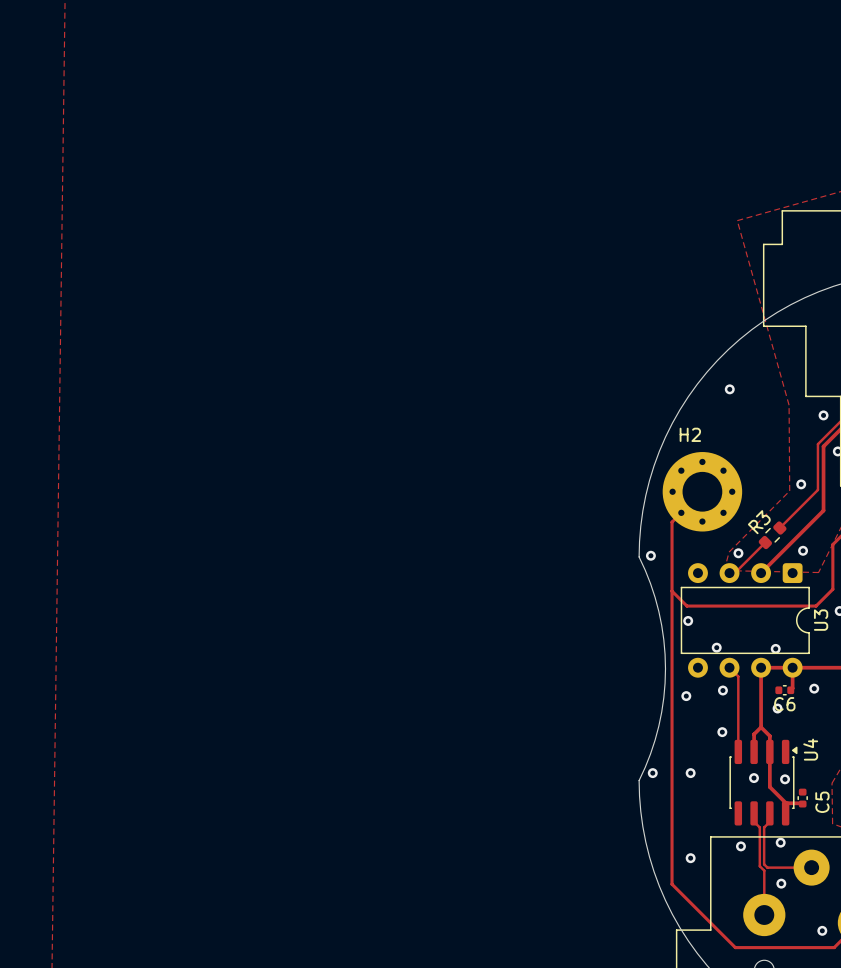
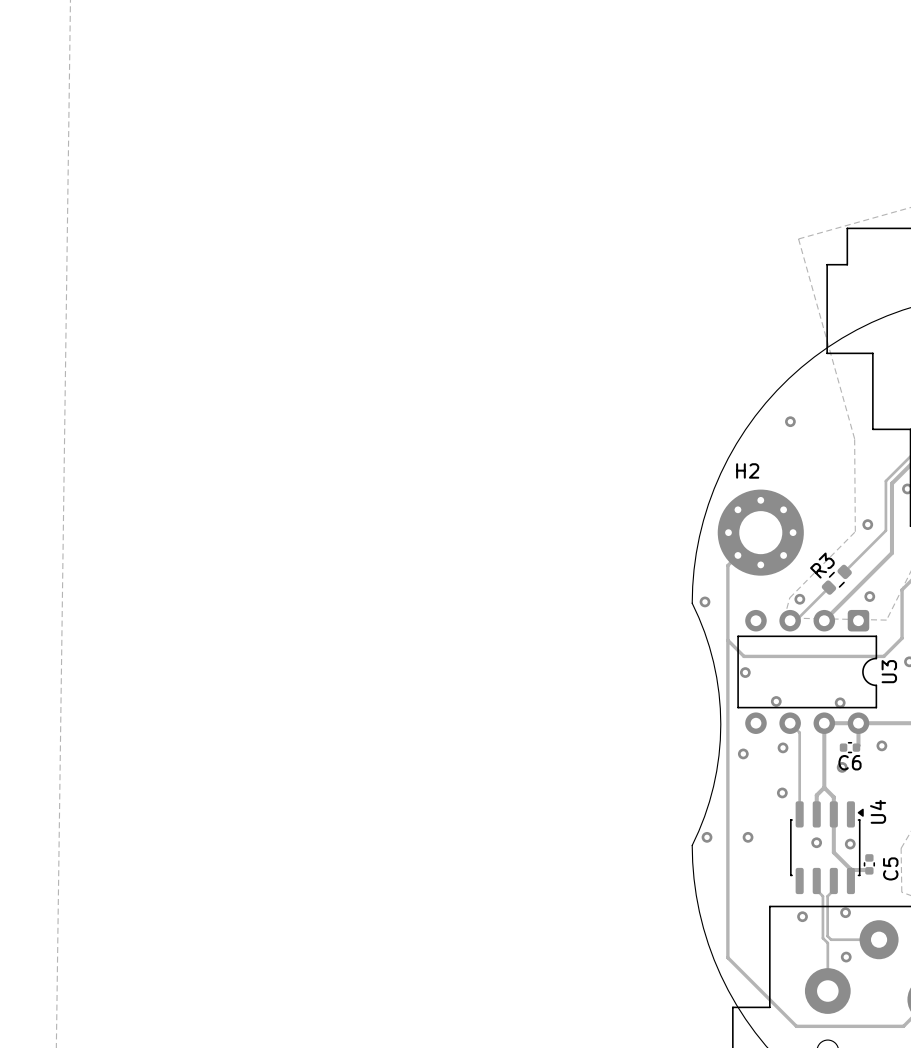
via: (823, 415) -> none
via: (690, 858) -> none
via: (822, 930) -> none

